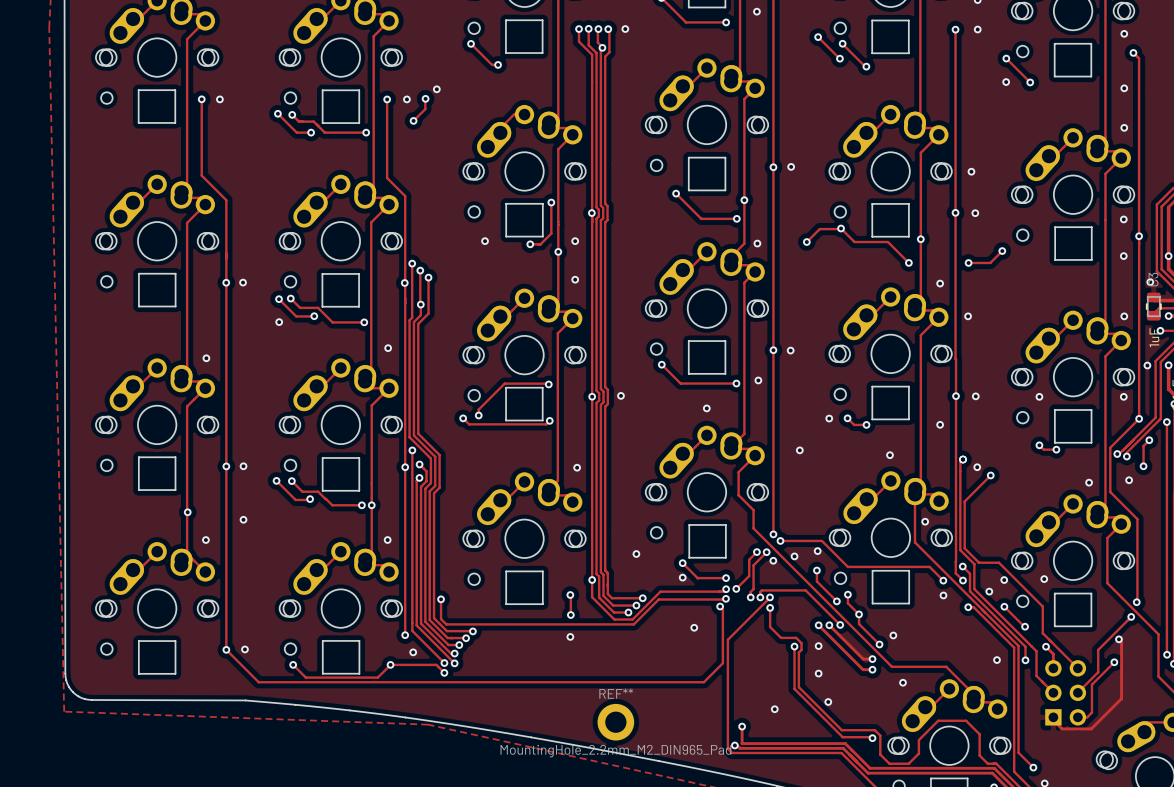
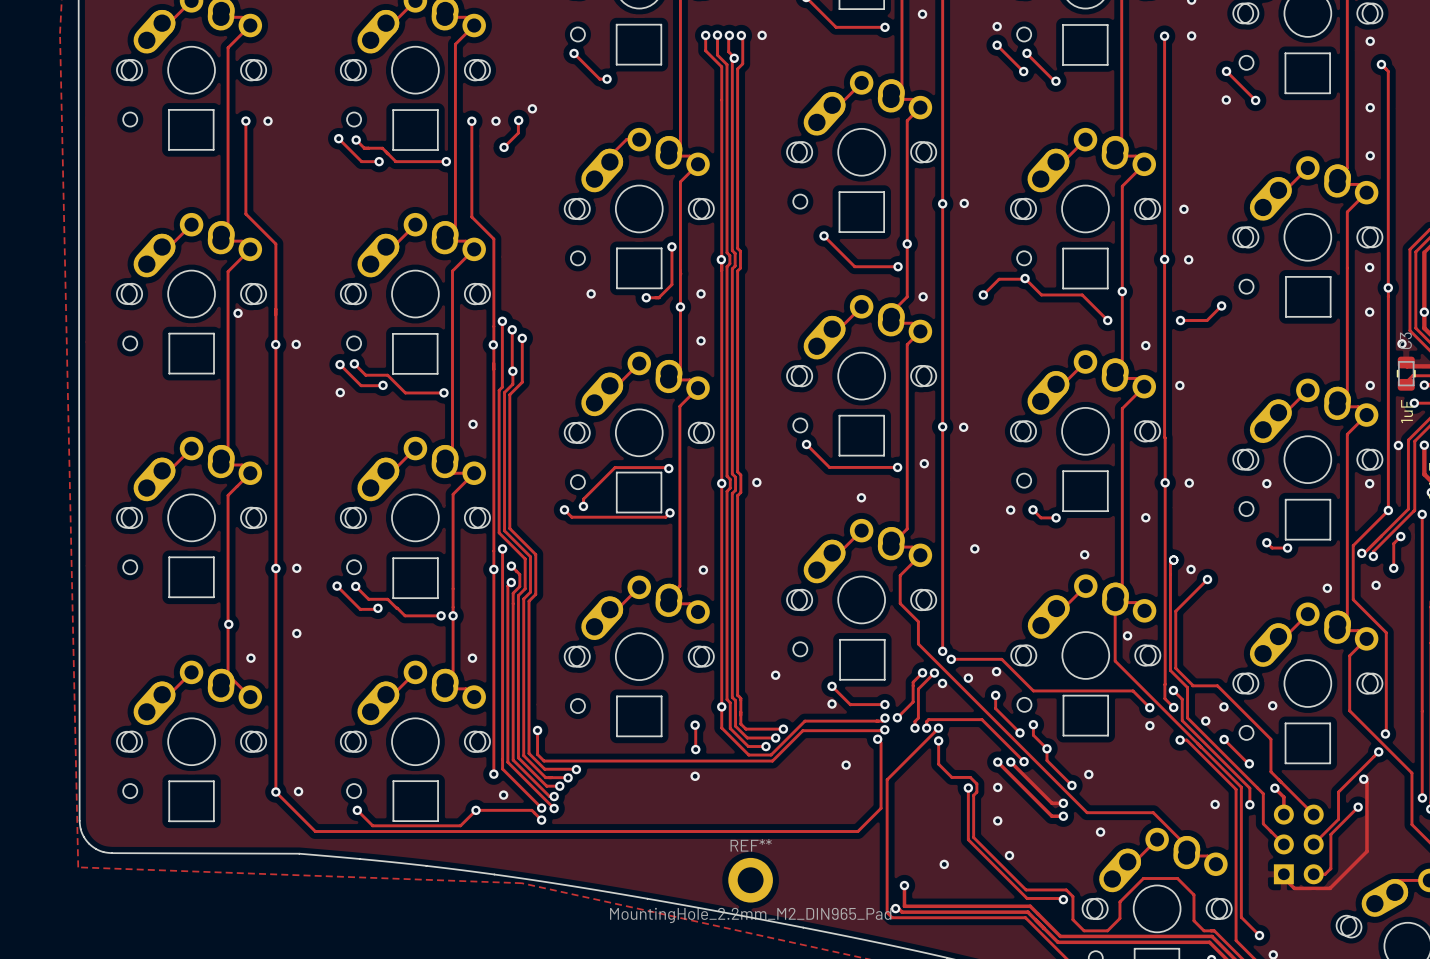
via: none -> (997, 26)
via: none -> (238, 313)
via: (206, 358) -> none

